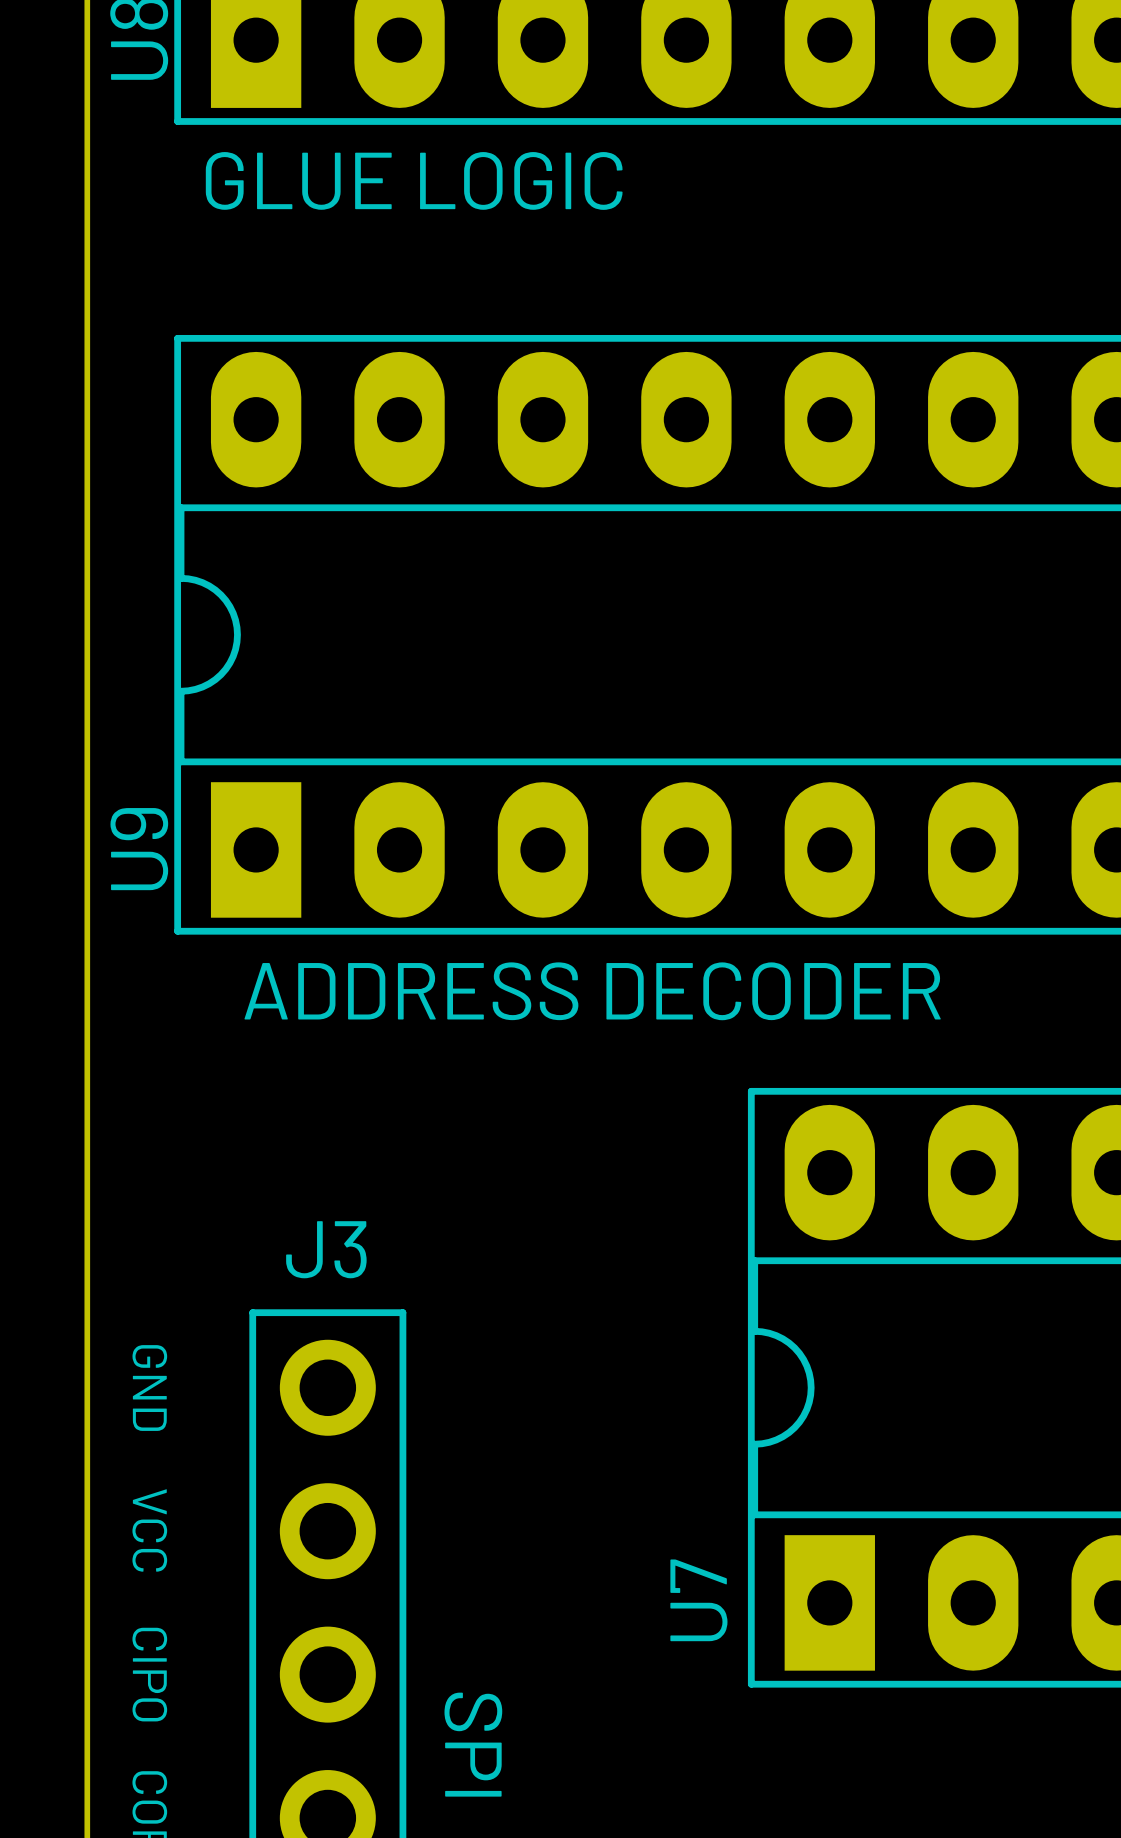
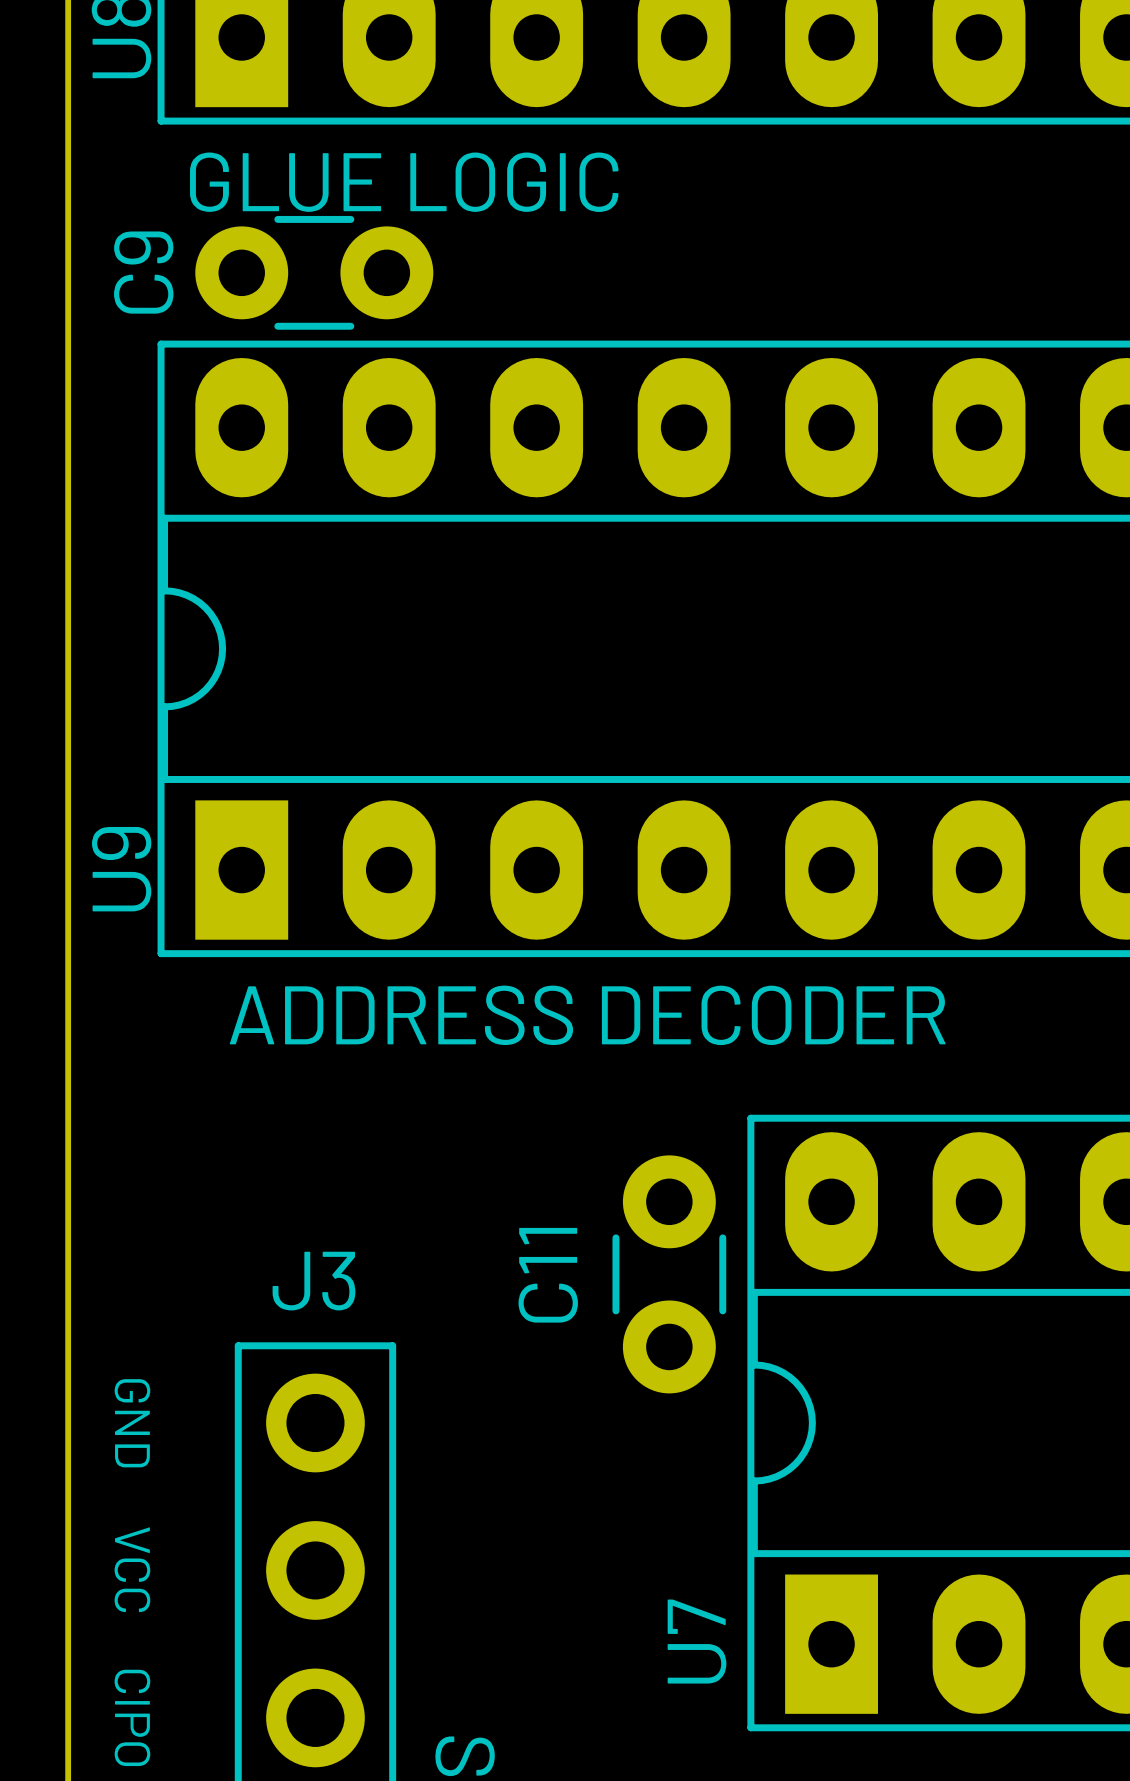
C9: none -> (314, 272)
C11: none -> (669, 1274)

